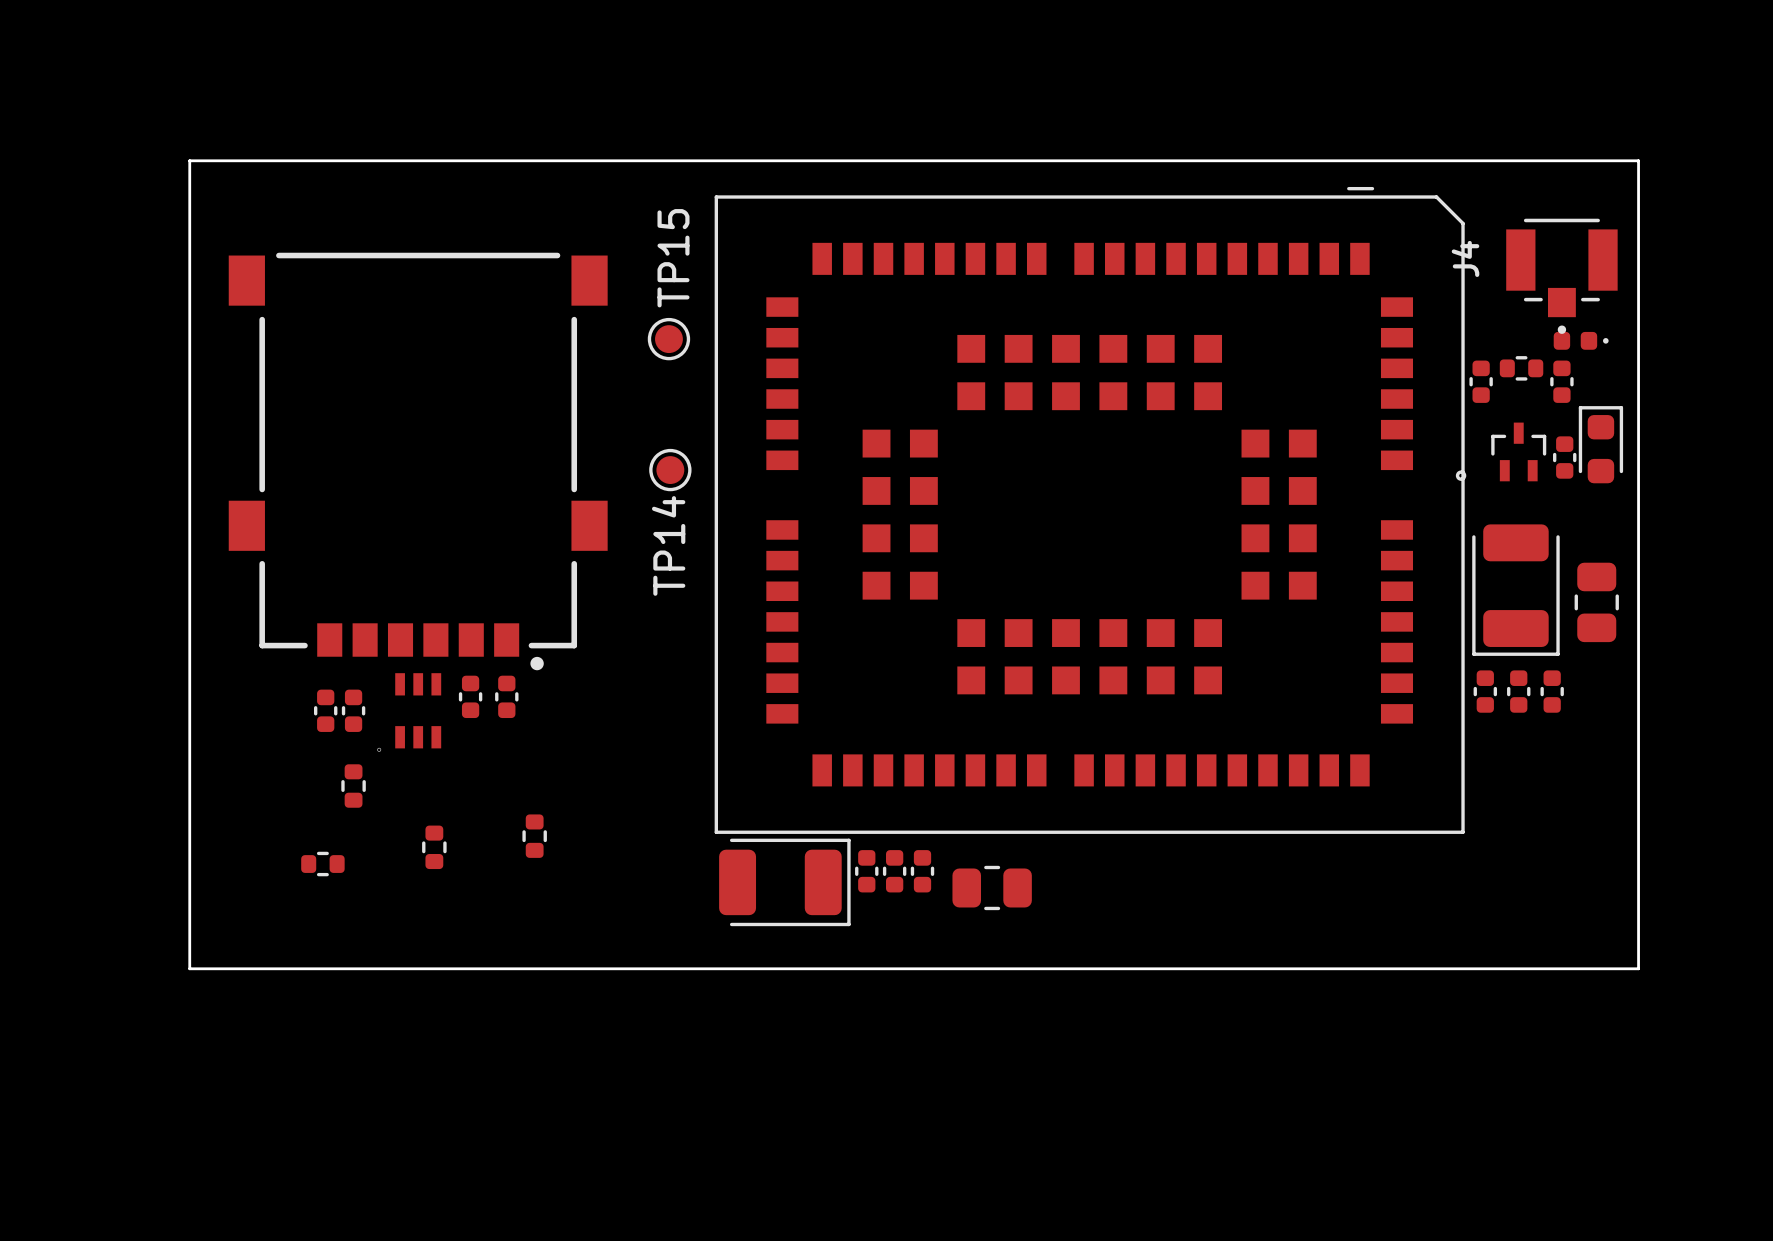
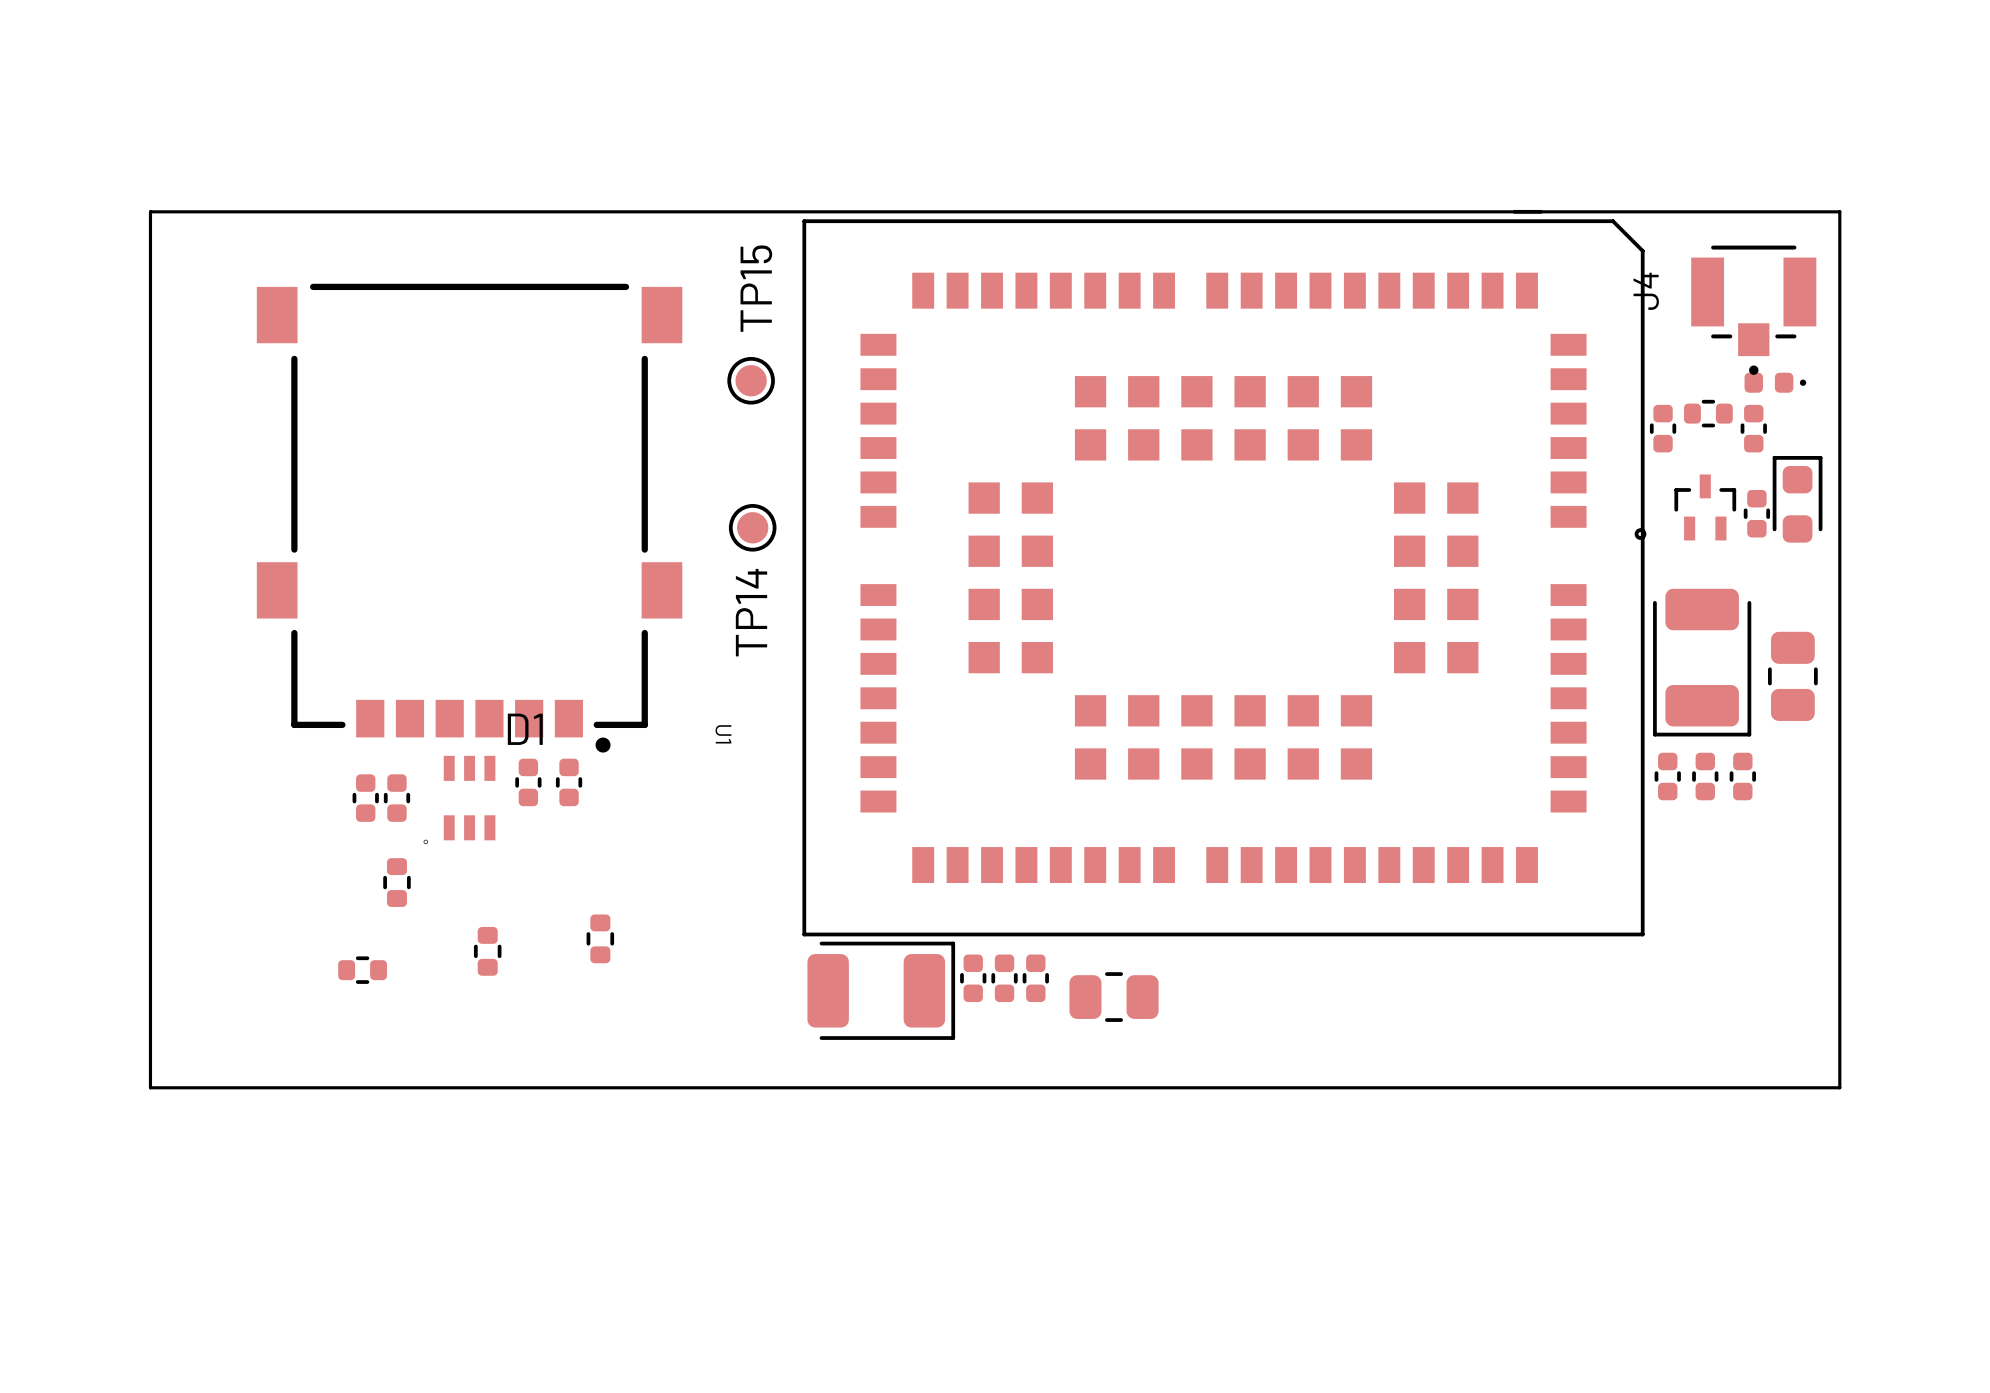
board edge: (1638, 188) (1638, 160) (189, 160) (189, 968) -> (1839, 211) (150, 211) (150, 1087) (213, 1087)
D1 name: none -> D1 (525, 729)
U1 name: none -> U1 (723, 734)

